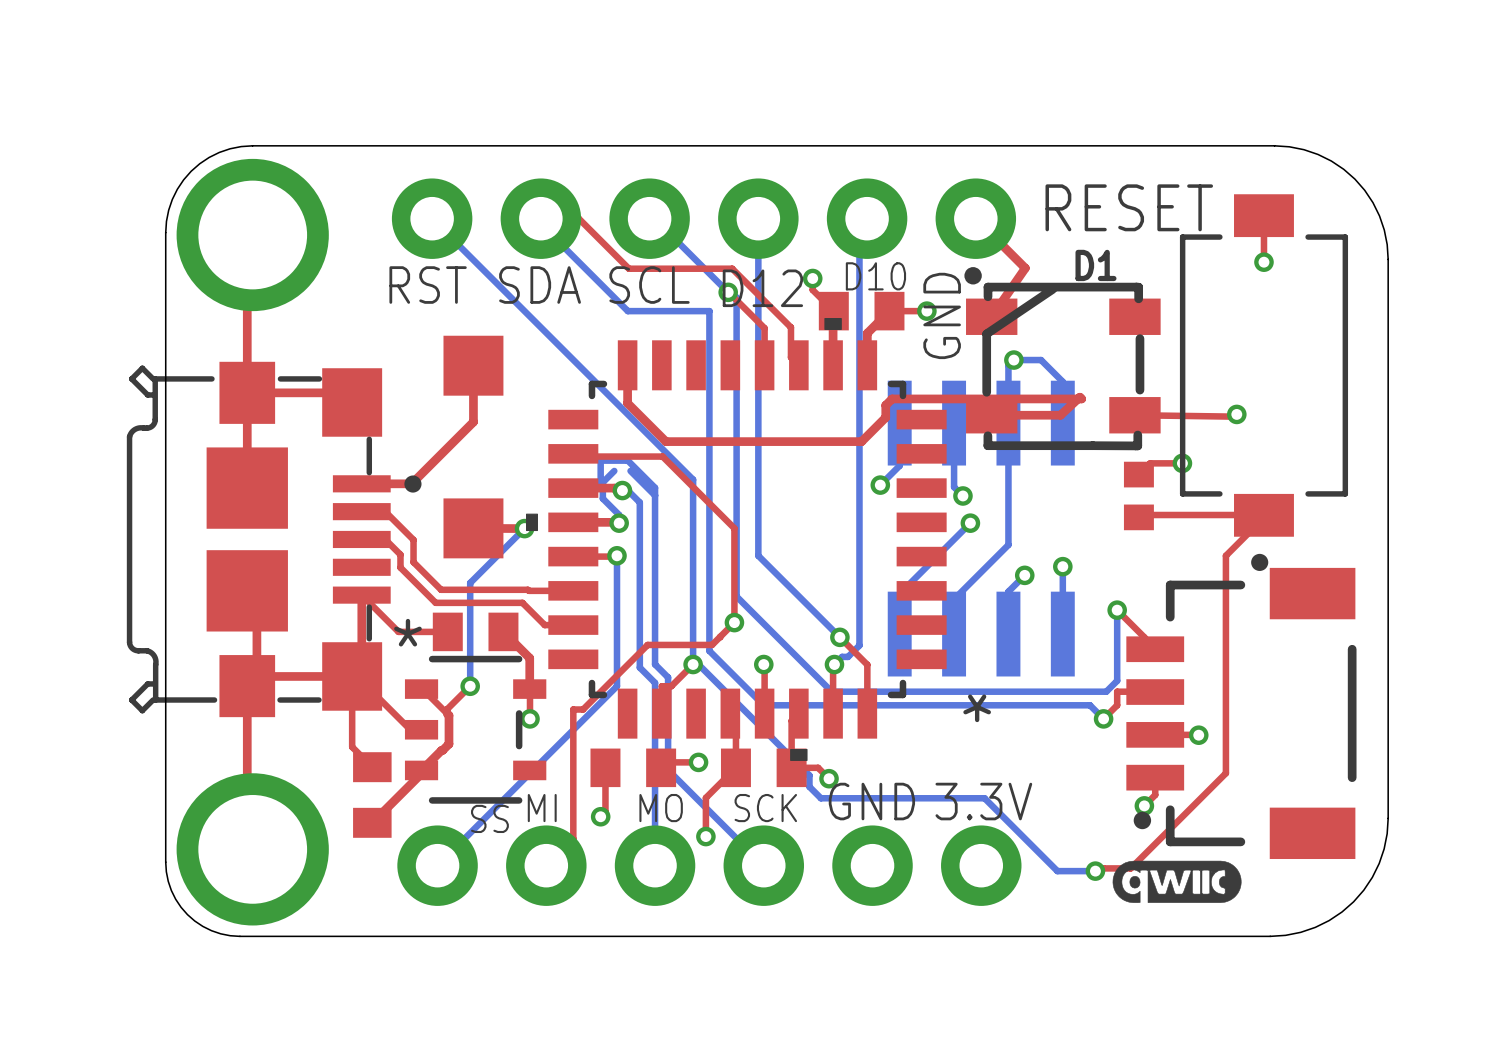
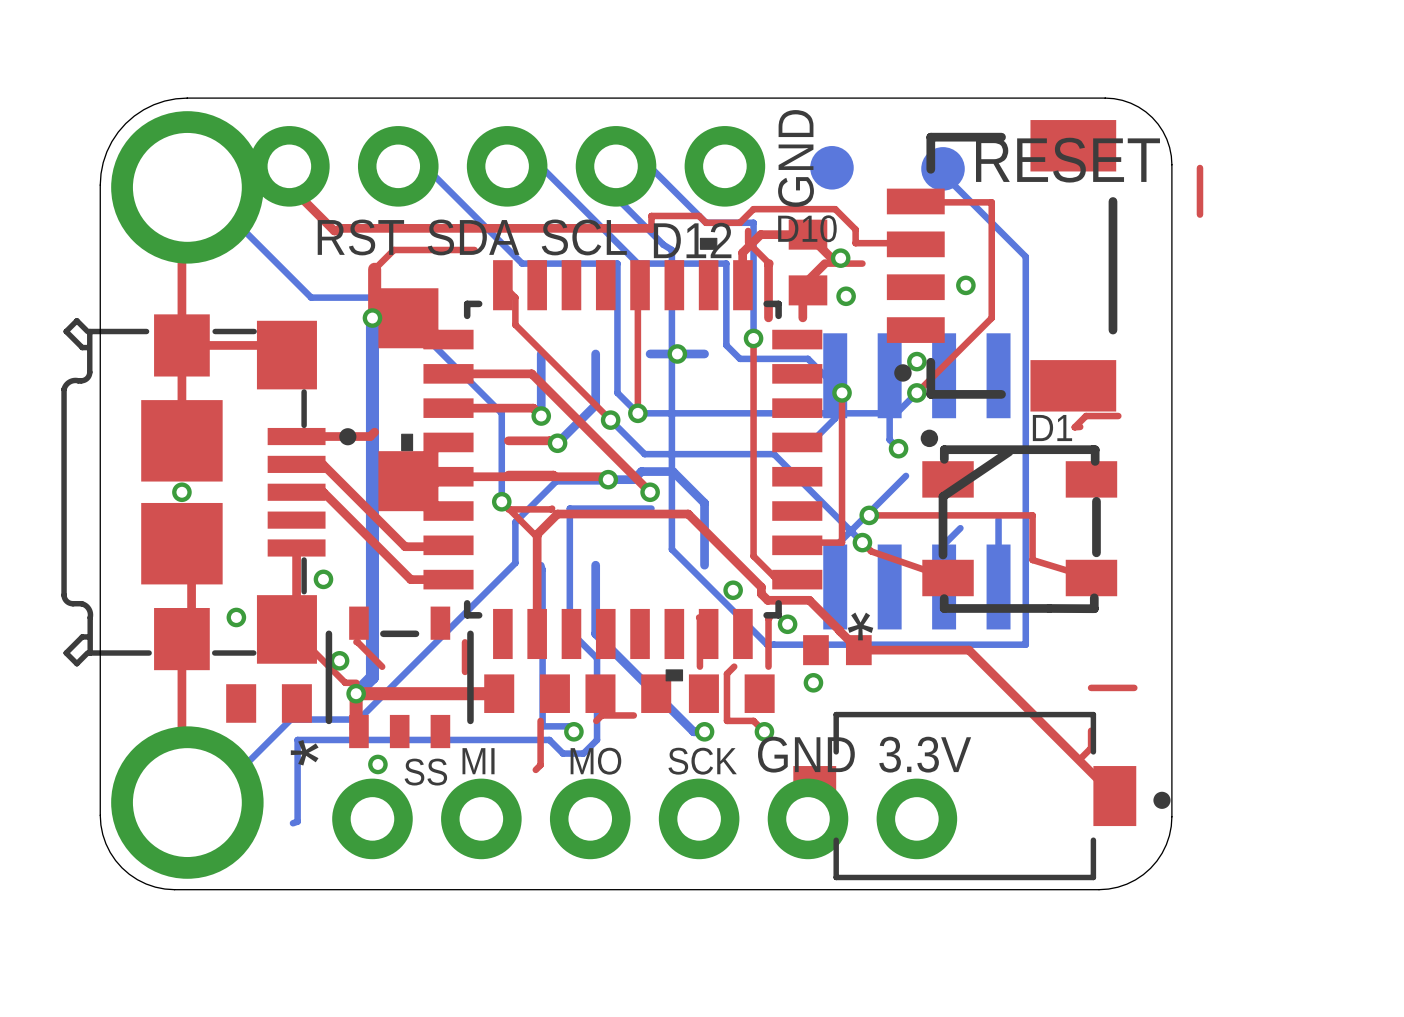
board edge: (1169, 145) (1274, 145) (1303, 149) (1318, 154) (1343, 169) (1364, 190) (1372, 202) (1384, 230) (1388, 259) (1388, 818) (1384, 848) (1372, 877) (1353, 901) (1329, 920) (1300, 932) (1285, 935) (1163, 936) -> (1105, 98) (1130, 103) (1152, 117) (1166, 139) (1171, 156) (1171, 816) (1166, 844) (1150, 868) (1126, 884) (1099, 889)
bottom track: none -> (180, 166) (311, 297) (386, 297) (501, 413) (501, 501)
top track: none -> (289, 166) (289, 185) (334, 230) (340, 228) (651, 229) (651, 215) (699, 215) (705, 222) (739, 222) (753, 209) (835, 209) (855, 229) (855, 243) (915, 244)
bottom track: none -> (616, 166) (617, 168) (651, 168) (705, 222) (753, 222) (753, 338)
part: none -> (831, 167)
part: none -> (943, 168)
bottom track: (432, 218) (693, 479) (693, 664) (698, 664) (809, 775) (809, 786) (820, 798) (984, 798) (1057, 871) (1095, 871) -> none
top track: (540, 218) (578, 218) (628, 268) (732, 268) (790, 327) (790, 357) (798, 365) -> none
bottom track: (540, 218) (546, 229) (627, 311) -> (398, 166) (399, 168) (426, 168) (522, 263) (563, 263)
part position: (703, 218) -> (452, 166)
bottom track: (758, 218) (758, 555) (839, 637) -> none
bottom track: (867, 218) (859, 226) (859, 645) (848, 656) (842, 656) (834, 664) -> none
top track: (975, 218) (1025, 268) (991, 316) -> none
top track: none -> (915, 201) (991, 202) (991, 318) (916, 392)
via: (1263, 262) -> none
via: (812, 278) -> none
top track: (728, 292) (764, 328) (764, 365) -> none
via: (728, 292) -> none
top track: none -> (474, 249) (393, 249) (374, 269) (374, 315) (372, 318)
top track: none -> (840, 258) (831, 258) (808, 234) (760, 234) (742, 252) (742, 284)
via: none -> (840, 258)
bottom track: (682, 311) (702, 311) -> (507, 166) (508, 168) (542, 168) (637, 263)
bottom track: none -> (617, 263) (617, 392) (637, 413) (896, 413) (916, 392)
bottom track: (709, 311) (709, 650) (763, 705) (1090, 705) (1103, 718) -> (644, 263) (726, 263) (726, 345) (739, 358) (808, 358) (842, 392)
part rotation: 0° (861, 311) -> 90° clockwise (808, 262)
via: (926, 311) -> none
text position: GND (942, 315) -> GND (796, 158)
top track: none -> (502, 285) (515, 297) (515, 324) (610, 420)
top track: none -> (640, 285) (637, 290) (637, 413)
via: none -> (965, 285)
via: none -> (846, 296)
D1 position: (1062, 358) -> (1018, 521)
via: (1013, 360) -> none
bottom track: none -> (372, 318) (372, 677) (356, 693)
via: none -> (372, 318)
top track: (473, 365) (473, 422) (411, 483) -> (374, 432) (370, 436) (346, 436)
top track: (627, 365) (627, 403) (665, 441) (861, 441) (885, 417) (885, 405) (892, 398) (1081, 398) (1079, 397) (1060, 415) (991, 415) -> none
part rotation: 0° (1263, 382) -> 90° counterclockwise (981, 796)
part position: (1263, 382) -> (981, 796)
top track: none -> (753, 338) (753, 556) (773, 576) (794, 576) (797, 579)
via: none -> (753, 338)
bottom track: none -> (541, 353) (541, 416)
bottom track: none -> (595, 353) (595, 405) (563, 437)
bottom track: none -> (650, 353) (704, 353)
via: none -> (677, 353)
via: none -> (916, 361)
top track: (1236, 414) (1234, 416) (1134, 415) -> none
via: (1236, 414) -> none
top track: none -> (448, 373) (531, 373) (650, 492)
bottom track: (1062, 423) (1062, 381) (1041, 360) (1013, 360) (1008, 365) (1008, 544) (954, 599) (954, 634) -> none
top track: none -> (842, 392) (842, 542) (801, 542) (797, 545)
via: none -> (842, 392)
via: none -> (916, 392)
top track: (573, 453) (576, 456) (662, 456) (734, 528) (734, 622) (712, 644) (647, 644) (583, 709) (573, 709) (573, 838) (546, 865) -> none
top track: none -> (448, 408) (533, 408) (541, 416)
via: none -> (637, 413)
via: none -> (541, 416)
via: (1182, 463) -> none
bottom track: none -> (610, 420) (644, 454) (773, 454) (862, 542)
via: none -> (610, 420)
bottom track: (614, 470) (602, 482) (602, 498) (619, 514) (619, 523) -> none
bottom track: (630, 470) (655, 495) -> none
via: (880, 485) -> none
bottom track: (602, 487) (600, 487) (600, 460) (627, 460) (655, 487) (655, 664) (668, 677) (668, 769) (763, 865) -> none
bottom track: (622, 490) (627, 490) (639, 502) (639, 667) (655, 682) (655, 865) -> none
part rotation: 0° (1138, 495) -> 90° clockwise (837, 650)
part position: (1138, 495) -> (837, 650)
top track: (385, 511) (413, 539) (413, 562) (441, 589) (573, 590) -> (320, 464) (322, 464) (405, 546) (448, 545)
top track: (1138, 517) (1144, 515) (1263, 515) (1225, 555) (1225, 773) (1130, 868) (1103, 868) (1095, 871) -> none
top track: none -> (448, 476) (605, 476) (608, 479)
via: (619, 523) -> none
via: (970, 523) -> none
via: none -> (608, 479)
bottom track: (524, 528) (470, 582) (470, 686) -> none
via: (524, 528) -> none
via: none -> (181, 492)
top track: (385, 539) (400, 554) (400, 567) (435, 602) (522, 602) (544, 625) (573, 625) -> (320, 492) (323, 492) (410, 579) (448, 579)
via: none -> (650, 492)
part position: (736, 539) -> (611, 459)
top track: none -> (501, 501) (537, 535)
via: none -> (501, 501)
bottom track: (616, 555) (616, 686) (437, 865) -> none
via: (616, 555) -> none
bottom track: none -> (651, 508) (569, 508) (569, 631) (597, 658) (597, 739) (583, 753) (563, 753) (549, 739) (297, 739) (297, 821) (292, 823)
top track: none -> (869, 515) (1032, 515) (1032, 560) (1091, 578)
via: none -> (869, 515)
via: (1062, 566) -> none
via: (1024, 575) -> none
top track: none -> (862, 542) (871, 551) (948, 578)
via: none -> (862, 542)
top track: (361, 595) (398, 631) (447, 631) -> none
top track: (1117, 610) (1155, 649) -> none
bottom track: (1117, 610) (1117, 680) (1106, 691) (1090, 691) -> (943, 168) (944, 175) (1025, 256) (1025, 644)
via: (1117, 610) -> none
bottom track: none -> (541, 565) (542, 726) (569, 726) (573, 731)
bottom track: none -> (595, 565) (595, 633) (693, 731) (704, 731)
bottom track: none -> (704, 565) (704, 503) (672, 471) (641, 471) (633, 479) (556, 481) (515, 522) (515, 563) (358, 719) (290, 719) (188, 821) (184, 823)
via: (734, 622) -> none
via: none -> (323, 579)
part: (475, 631) -> none
top track: (503, 631) (529, 658) (529, 689) -> none
via: none -> (733, 590)
top track: (839, 637) (867, 664) (867, 713) -> none
via: (839, 637) -> none
via: none -> (236, 617)
top track: (693, 664) (671, 686) (661, 686) (661, 713) -> none
via: (693, 664) -> none
via: (763, 664) -> none
via position: (834, 664) -> (787, 624)
top track: (256, 676) (352, 676) (352, 747) (372, 767) -> none
top track: none -> (839, 630) (809, 600) (767, 600) (761, 593) (761, 587) (688, 514) (557, 514) (537, 534) (537, 633)
top track: none -> (839, 631) (858, 650) (968, 650) (1114, 796)
top track: (470, 686) (447, 709) (448, 744) (372, 822) -> none
via: (470, 686) -> none
top track: (1155, 692) (1117, 691) (1117, 705) (1103, 718) -> none
via: none -> (339, 660)
top track: (730, 713) (735, 719) (735, 767) (705, 797) (705, 836) -> none
part position: (1241, 713) -> (1002, 265)
via: (530, 718) -> none
via: (1103, 718) -> none
part rotation: 0° (475, 729) -> 90° counterclockwise (399, 677)
via: none -> (813, 682)
via: (1198, 735) -> none
via: none -> (356, 693)
top track: none -> (499, 693) (356, 693) (356, 728) (358, 731)
part: none -> (527, 693)
part: none -> (628, 693)
part: none -> (731, 693)
via: (698, 762) -> none
part: (633, 767) -> none
part: (763, 767) -> none
via: none -> (573, 731)
via: none -> (704, 731)
part rotation: 0° (372, 795) -> 90° clockwise (269, 703)
part position: (372, 795) -> (269, 703)
via: (1144, 805) -> none
via: none -> (377, 764)
via: (600, 816) -> none
via: (705, 836) -> none
drawing: [1112, 860, 1242, 903] -> none
via: (1095, 871) -> none

